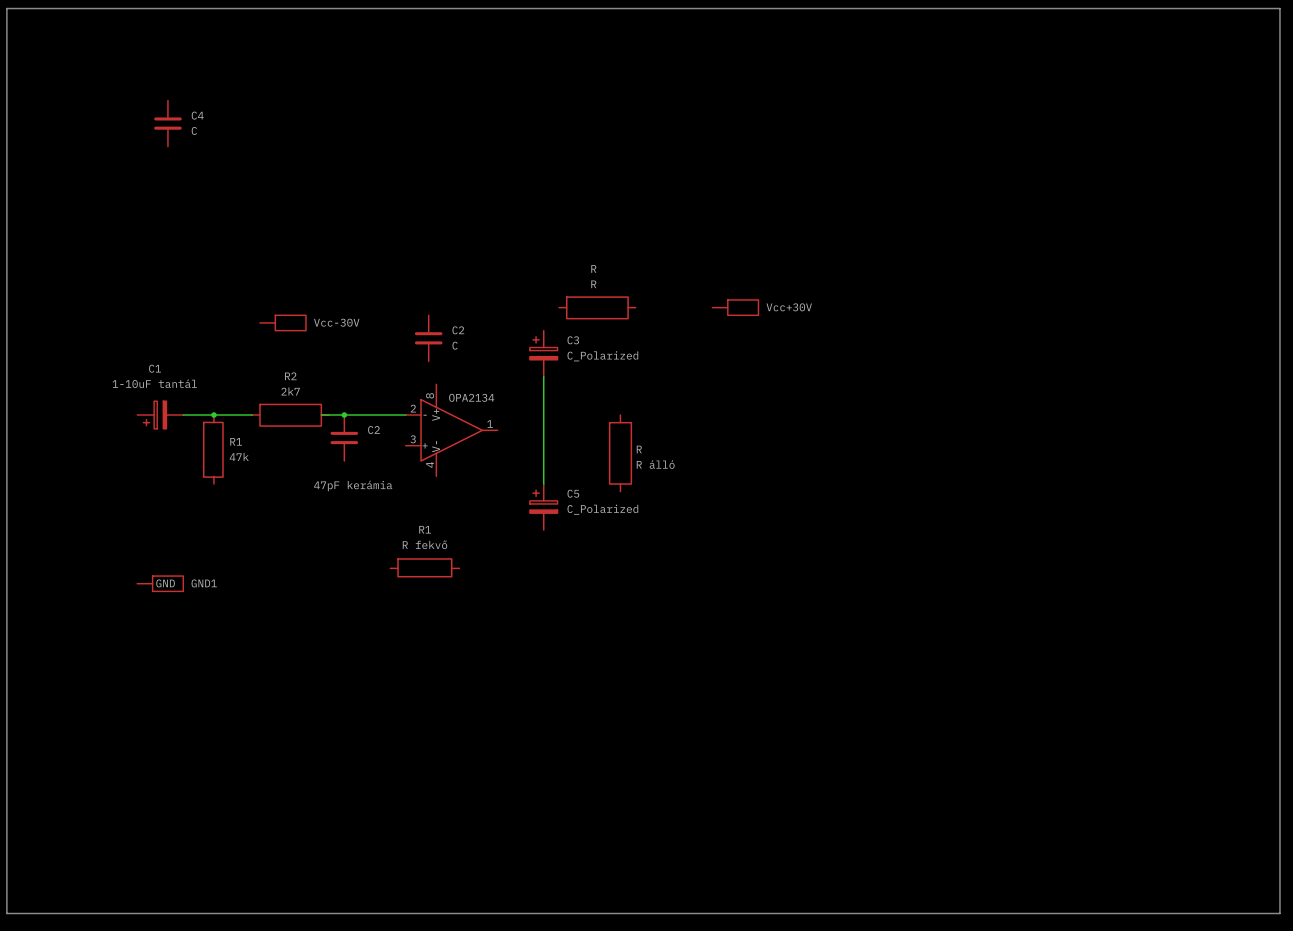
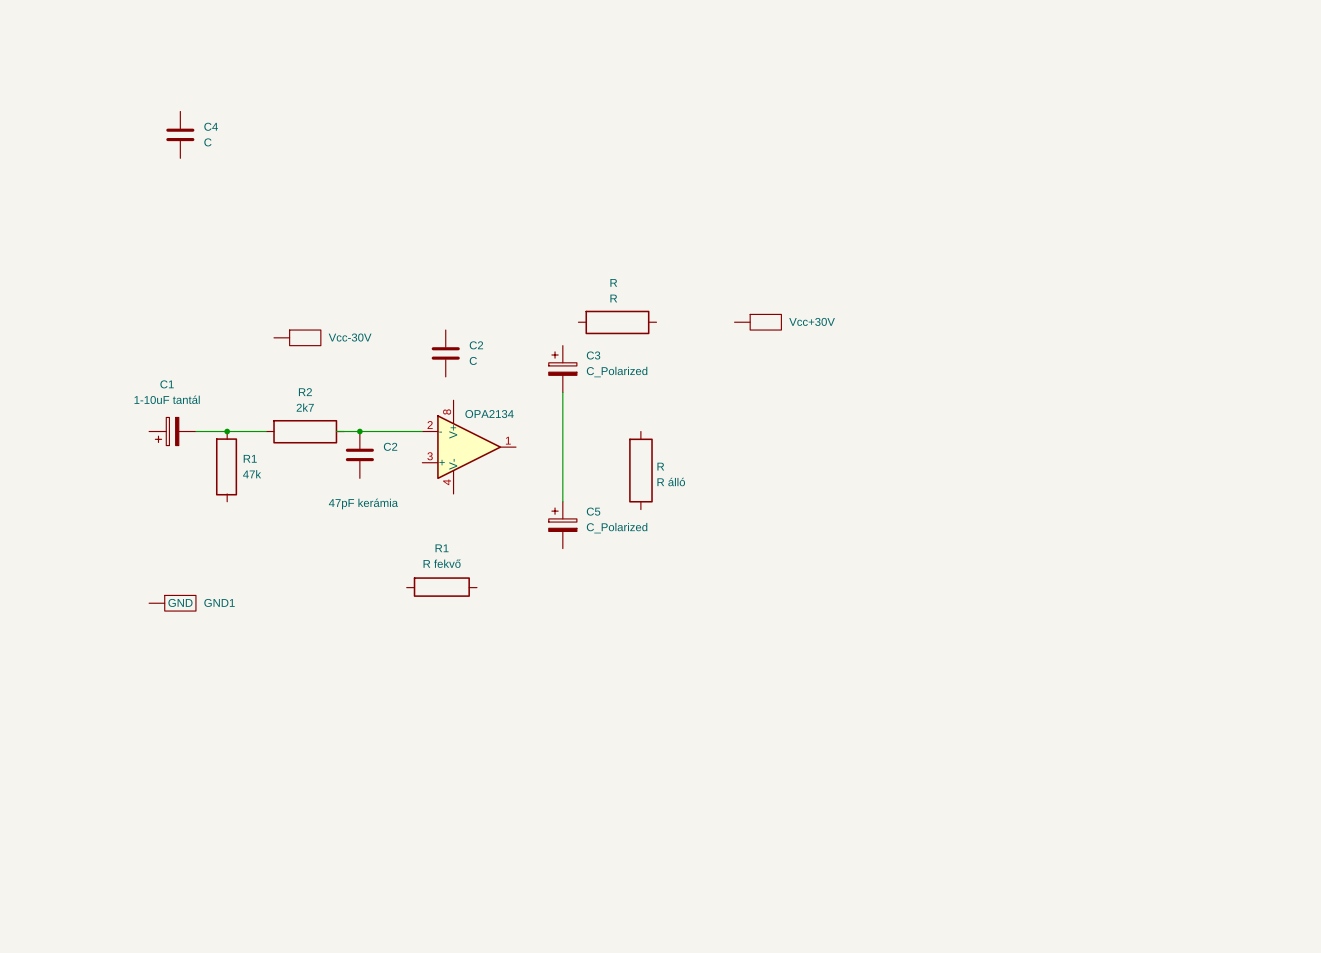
line: (6, 8) (1279, 8) (1279, 913) (6, 913) (6, 8) -> none

